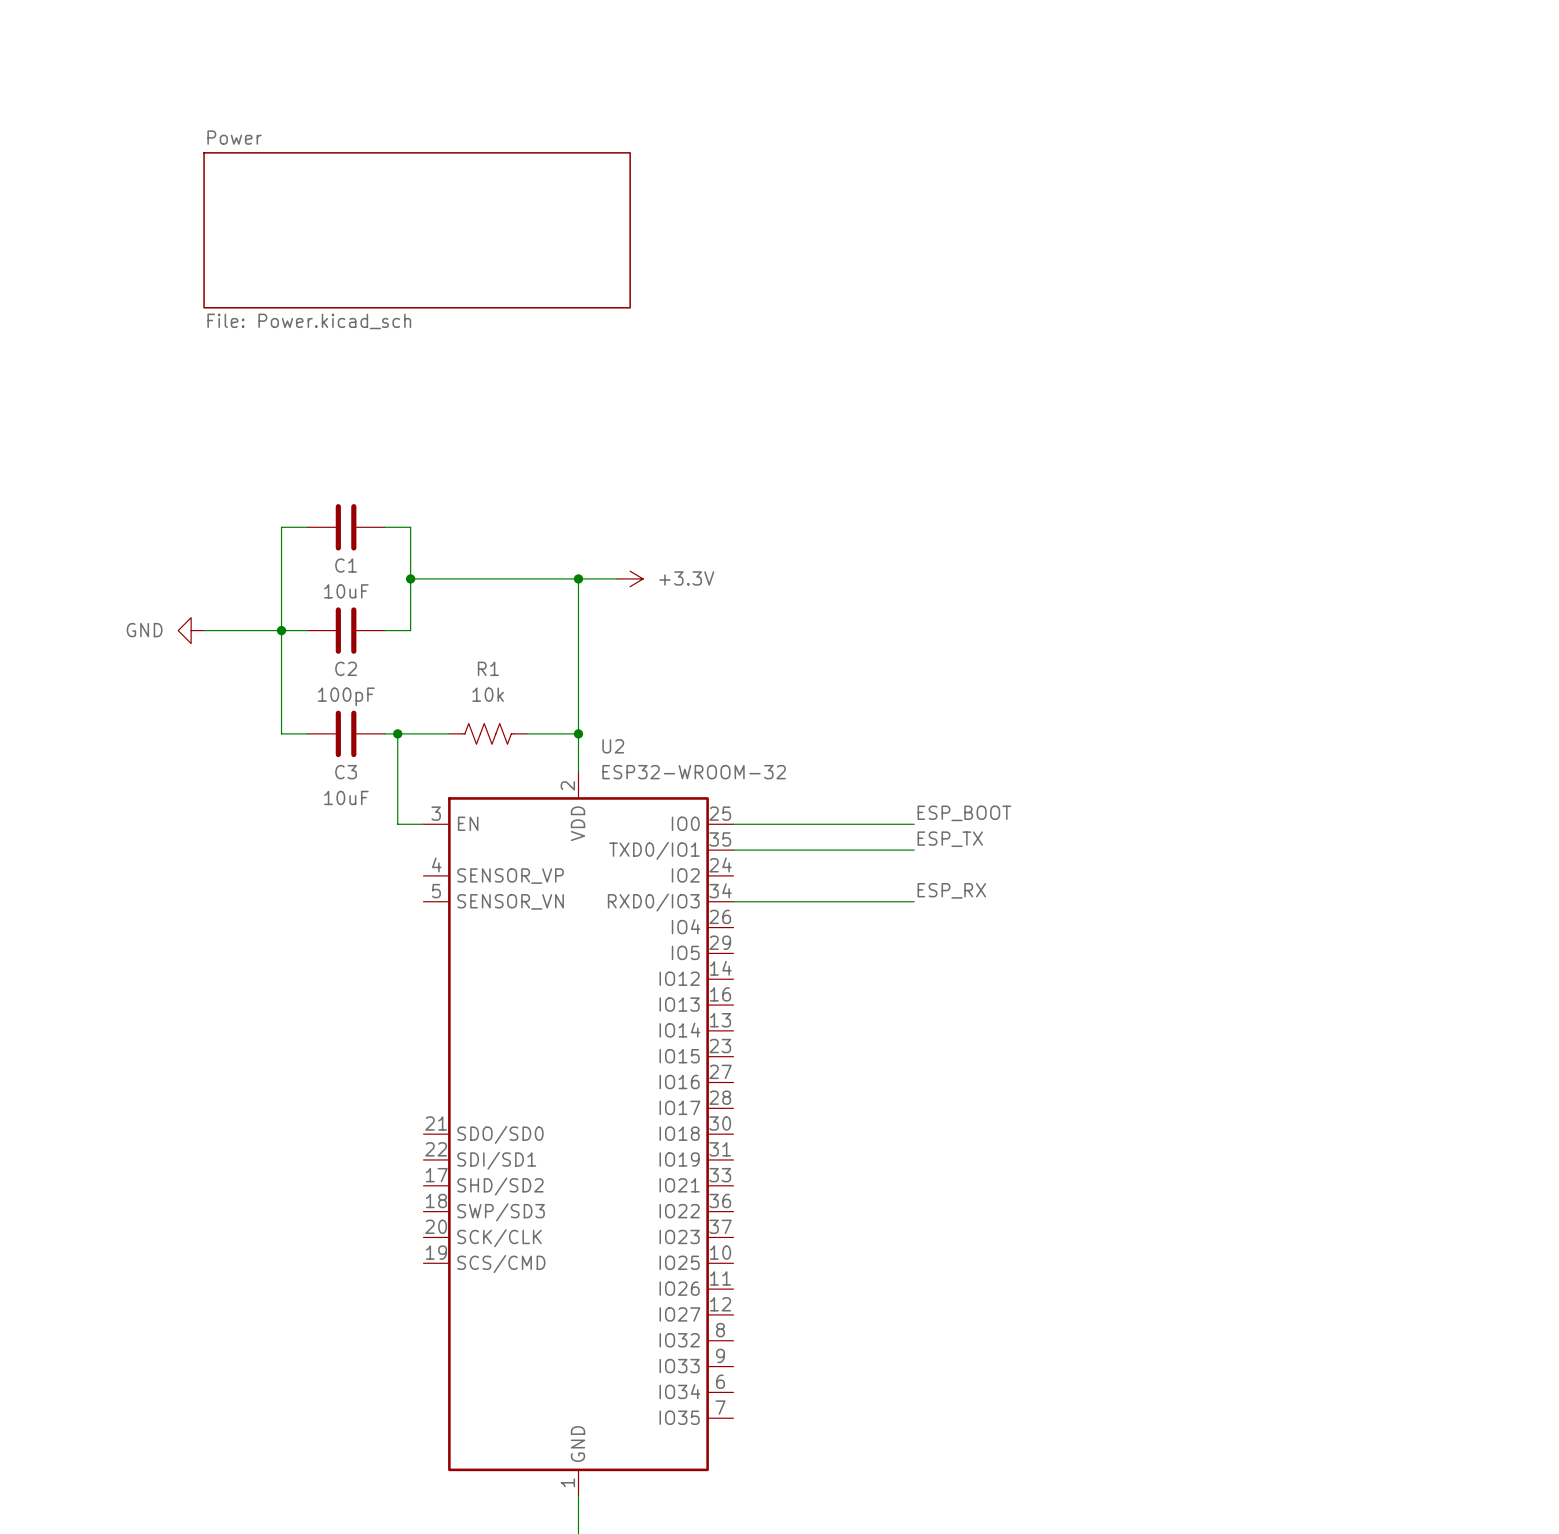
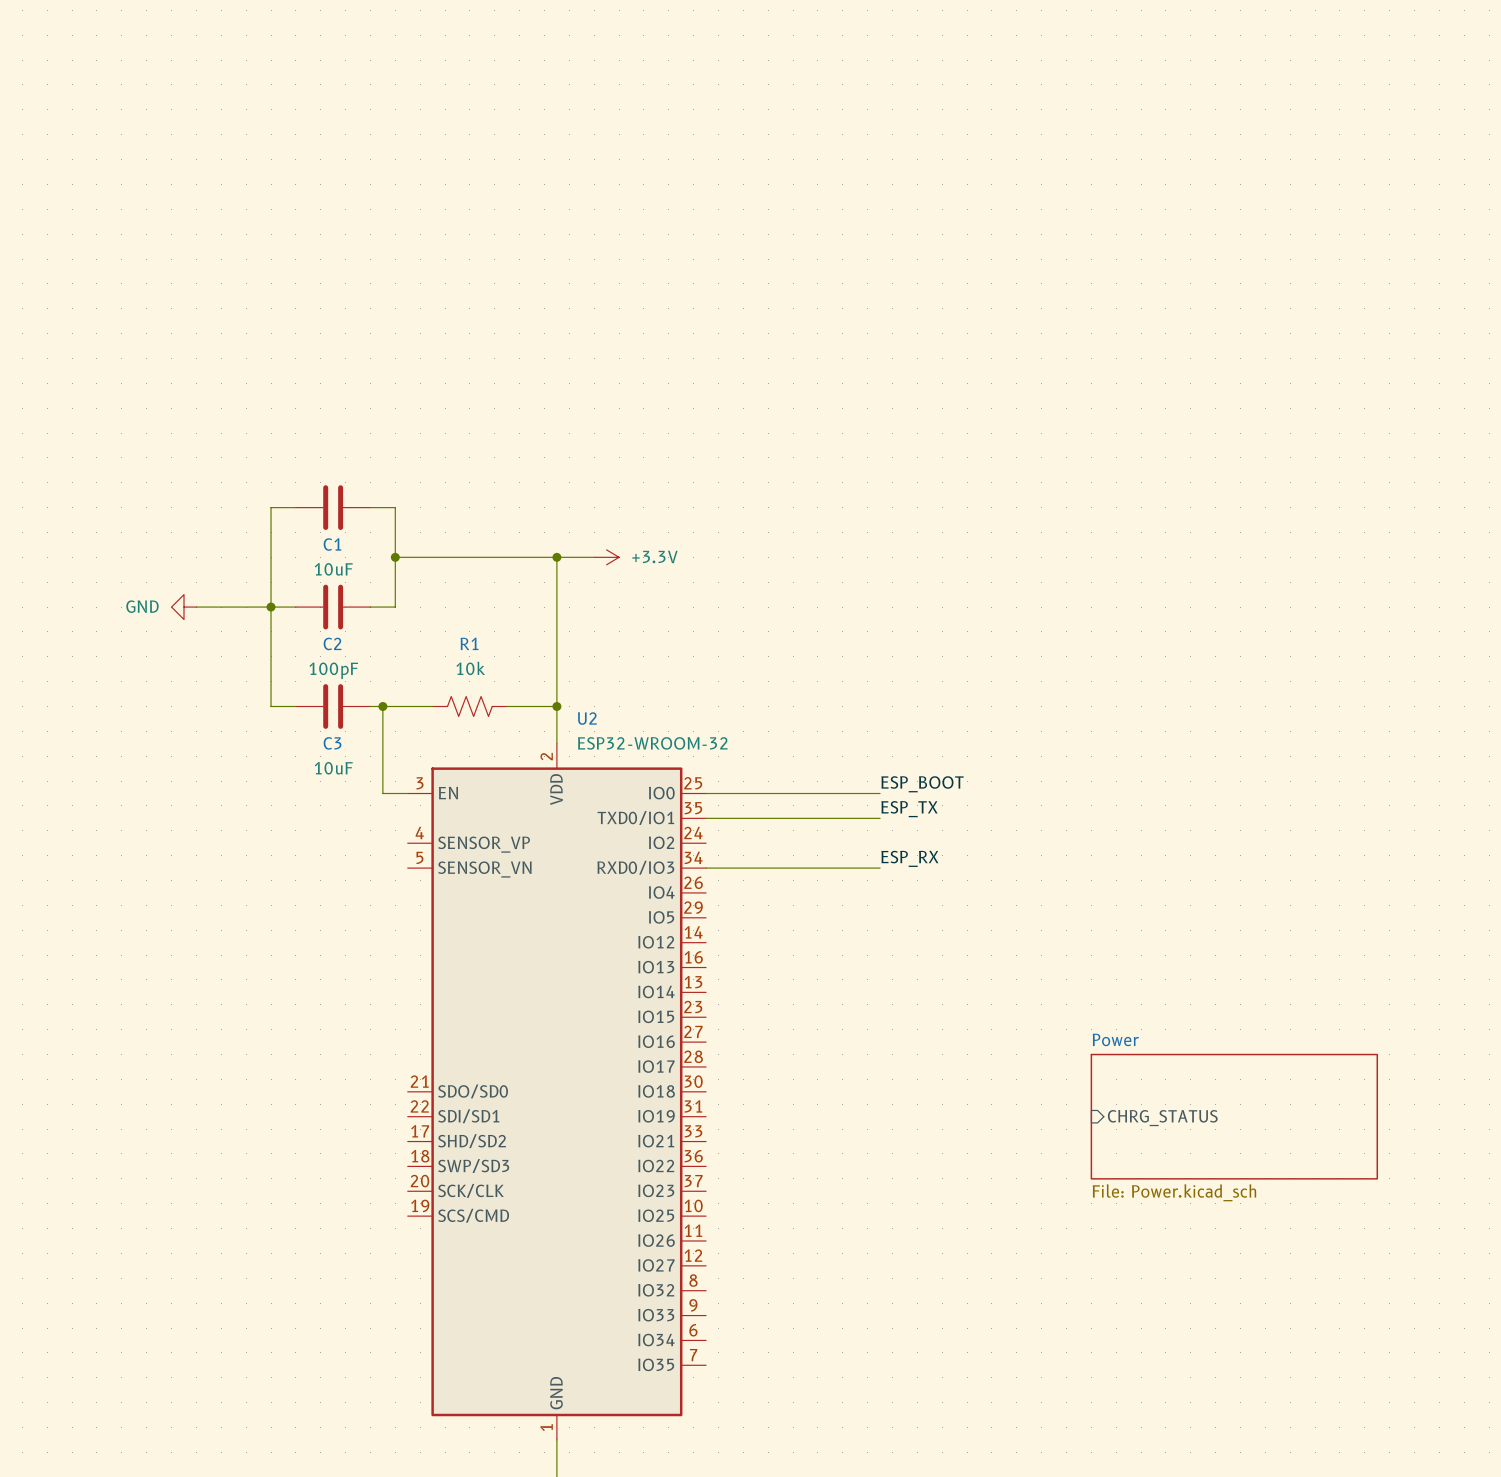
sheet Power: File: Power.kicad_sch (417, 230) -> none
sheet Power: none -> File: Power.kicad_sch (1234, 1116)
sheet pin: none -> CHRG_STATUS (1162, 1118)

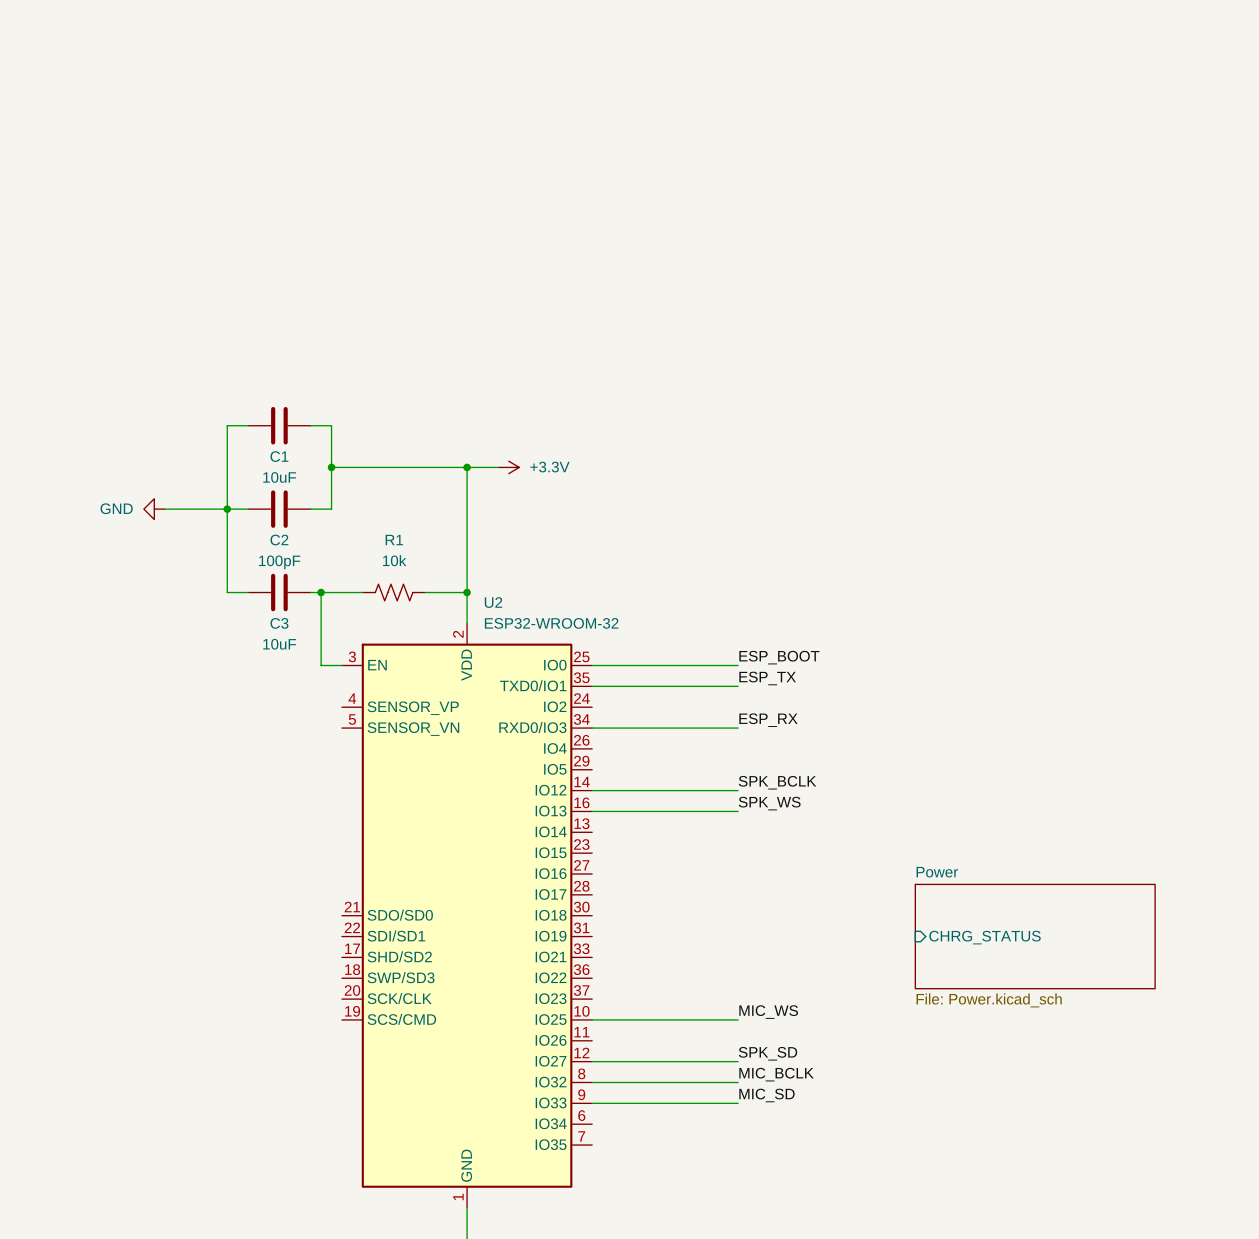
label: none -> SPK_BCLK (777, 782)
wire: none -> (592, 790) (738, 790)
label: none -> SPK_WS (769, 803)
wire: none -> (592, 811) (738, 811)
label: none -> MIC_WS (768, 1012)
wire: none -> (592, 1019) (738, 1019)
label: none -> SPK_SD (767, 1053)
wire: none -> (592, 1061) (738, 1061)
label: none -> MIC_BCLK (776, 1074)
wire: none -> (592, 1082) (738, 1082)
label: none -> MIC_SD (767, 1095)
wire: none -> (592, 1103) (738, 1103)

